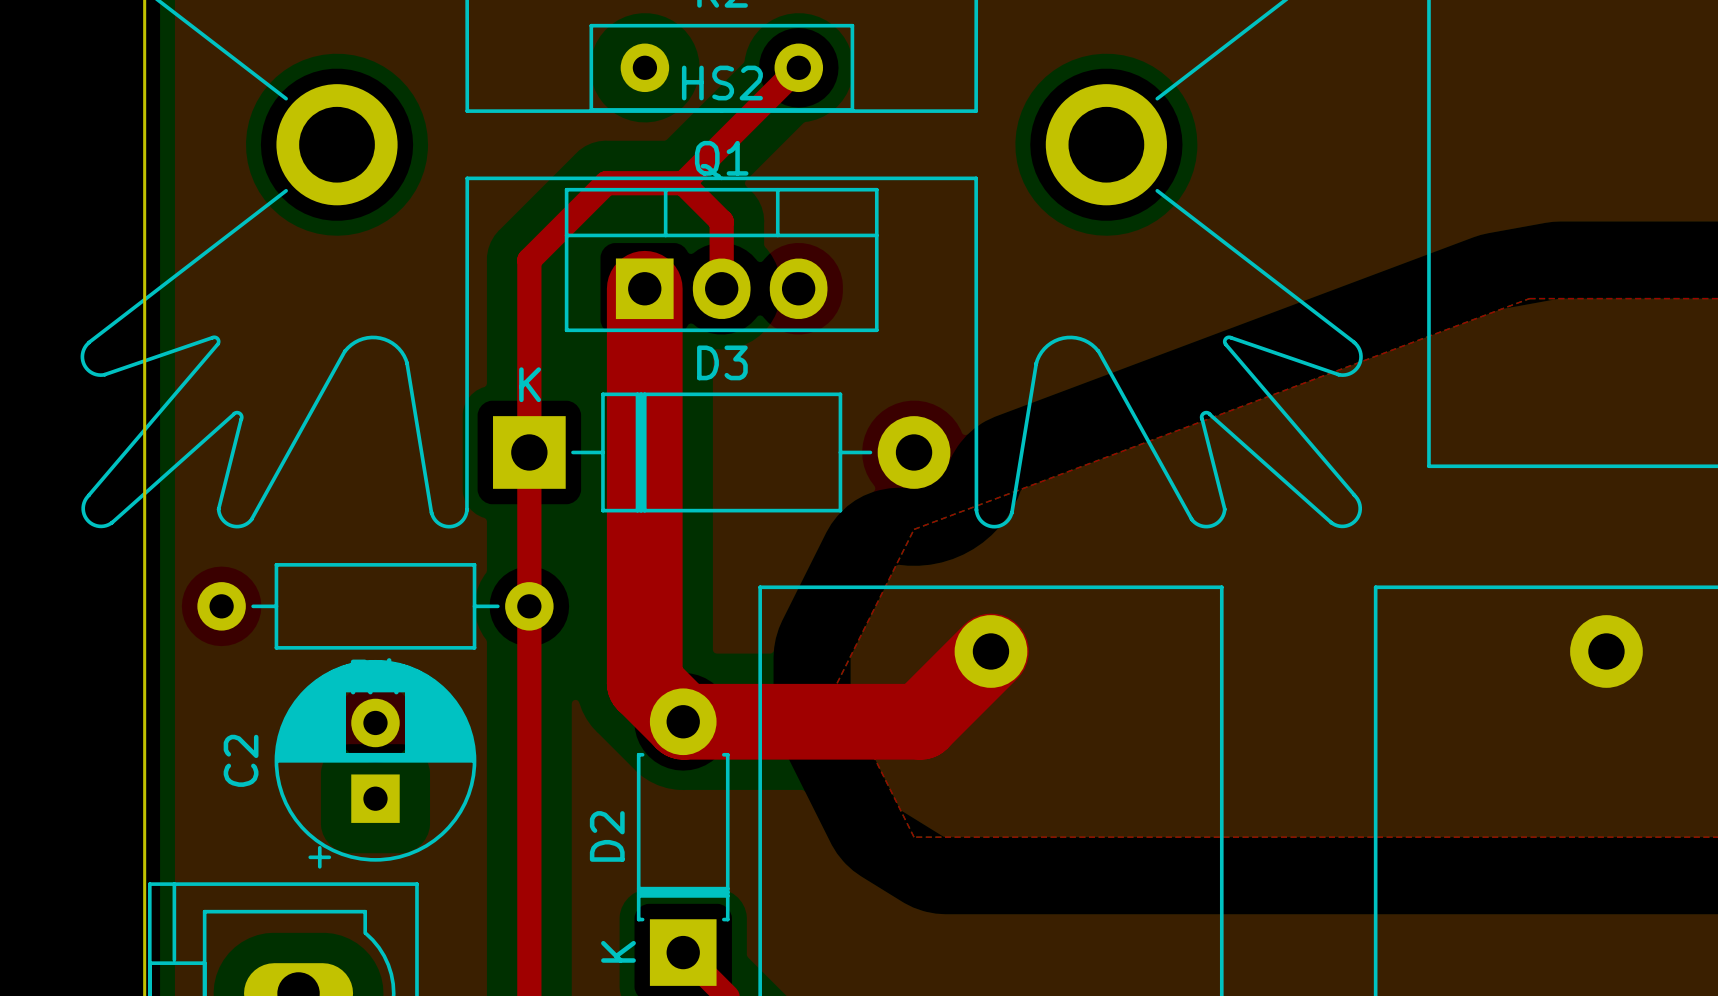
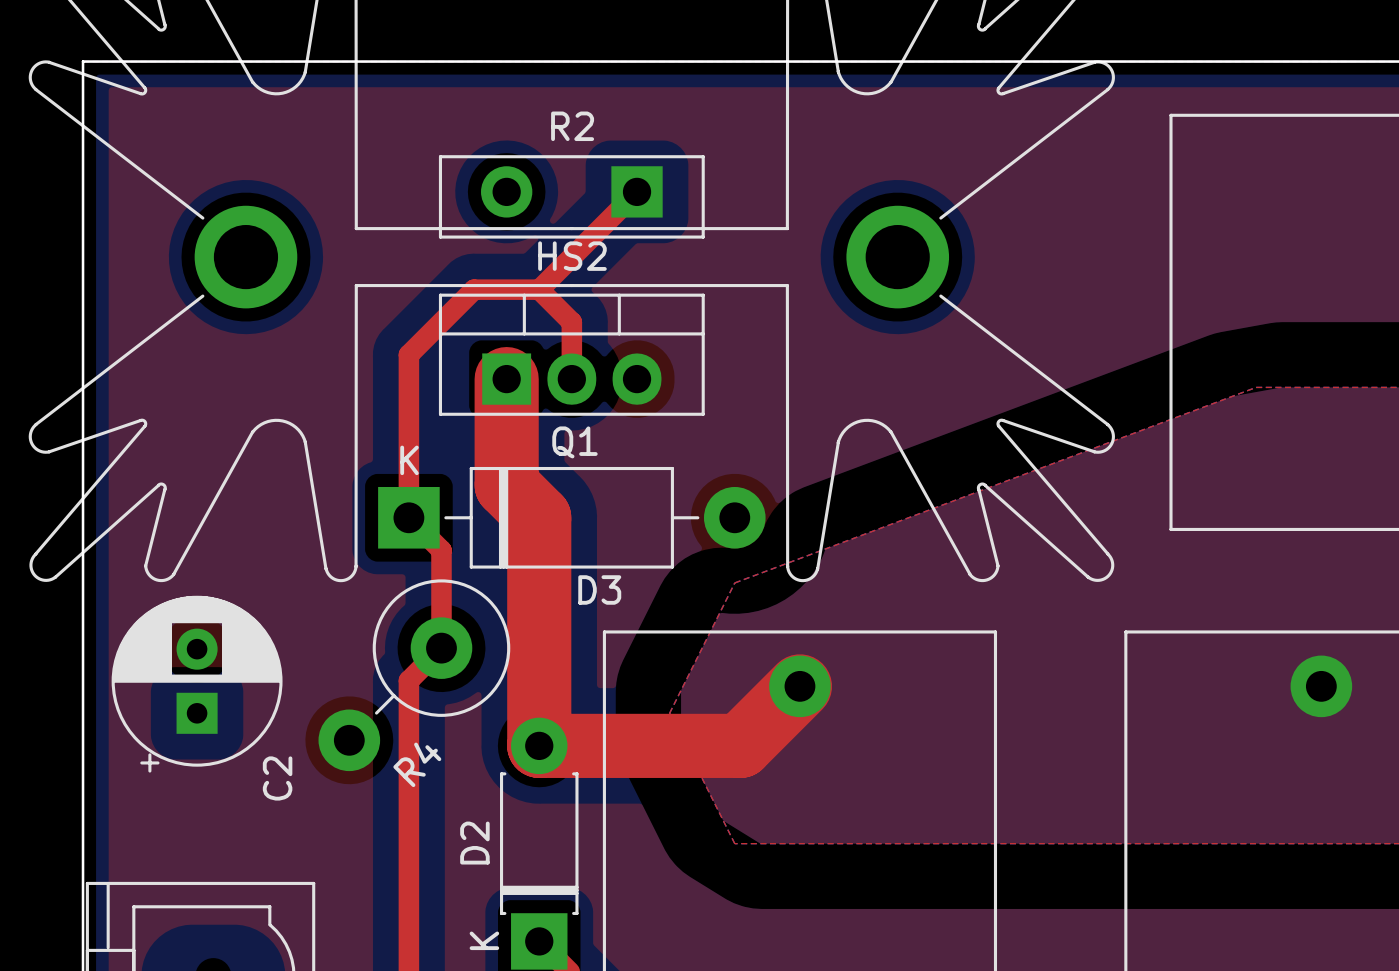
R2 footprint: [589, 23, 855, 112] -> [438, 155, 705, 239]
HS2 name position: HS2 (722, 83) -> HS2 (572, 256)
Q1 name position: Q1 (721, 159) -> Q1 (574, 442)
D3 name position: D3 (722, 362) -> D3 (599, 589)
top track: (644, 414) (644, 683) (683, 721) -> (506, 485) (539, 517) (539, 745)
top track: (529, 452) (529, 644) -> (408, 517) (441, 550) (441, 648) (408, 680)
R4 footprint: [197, 563, 554, 650] -> [318, 579, 511, 772]
C2 name position: C2 (241, 760) -> C2 (277, 778)
C2 position: (375, 764) -> (197, 684)

